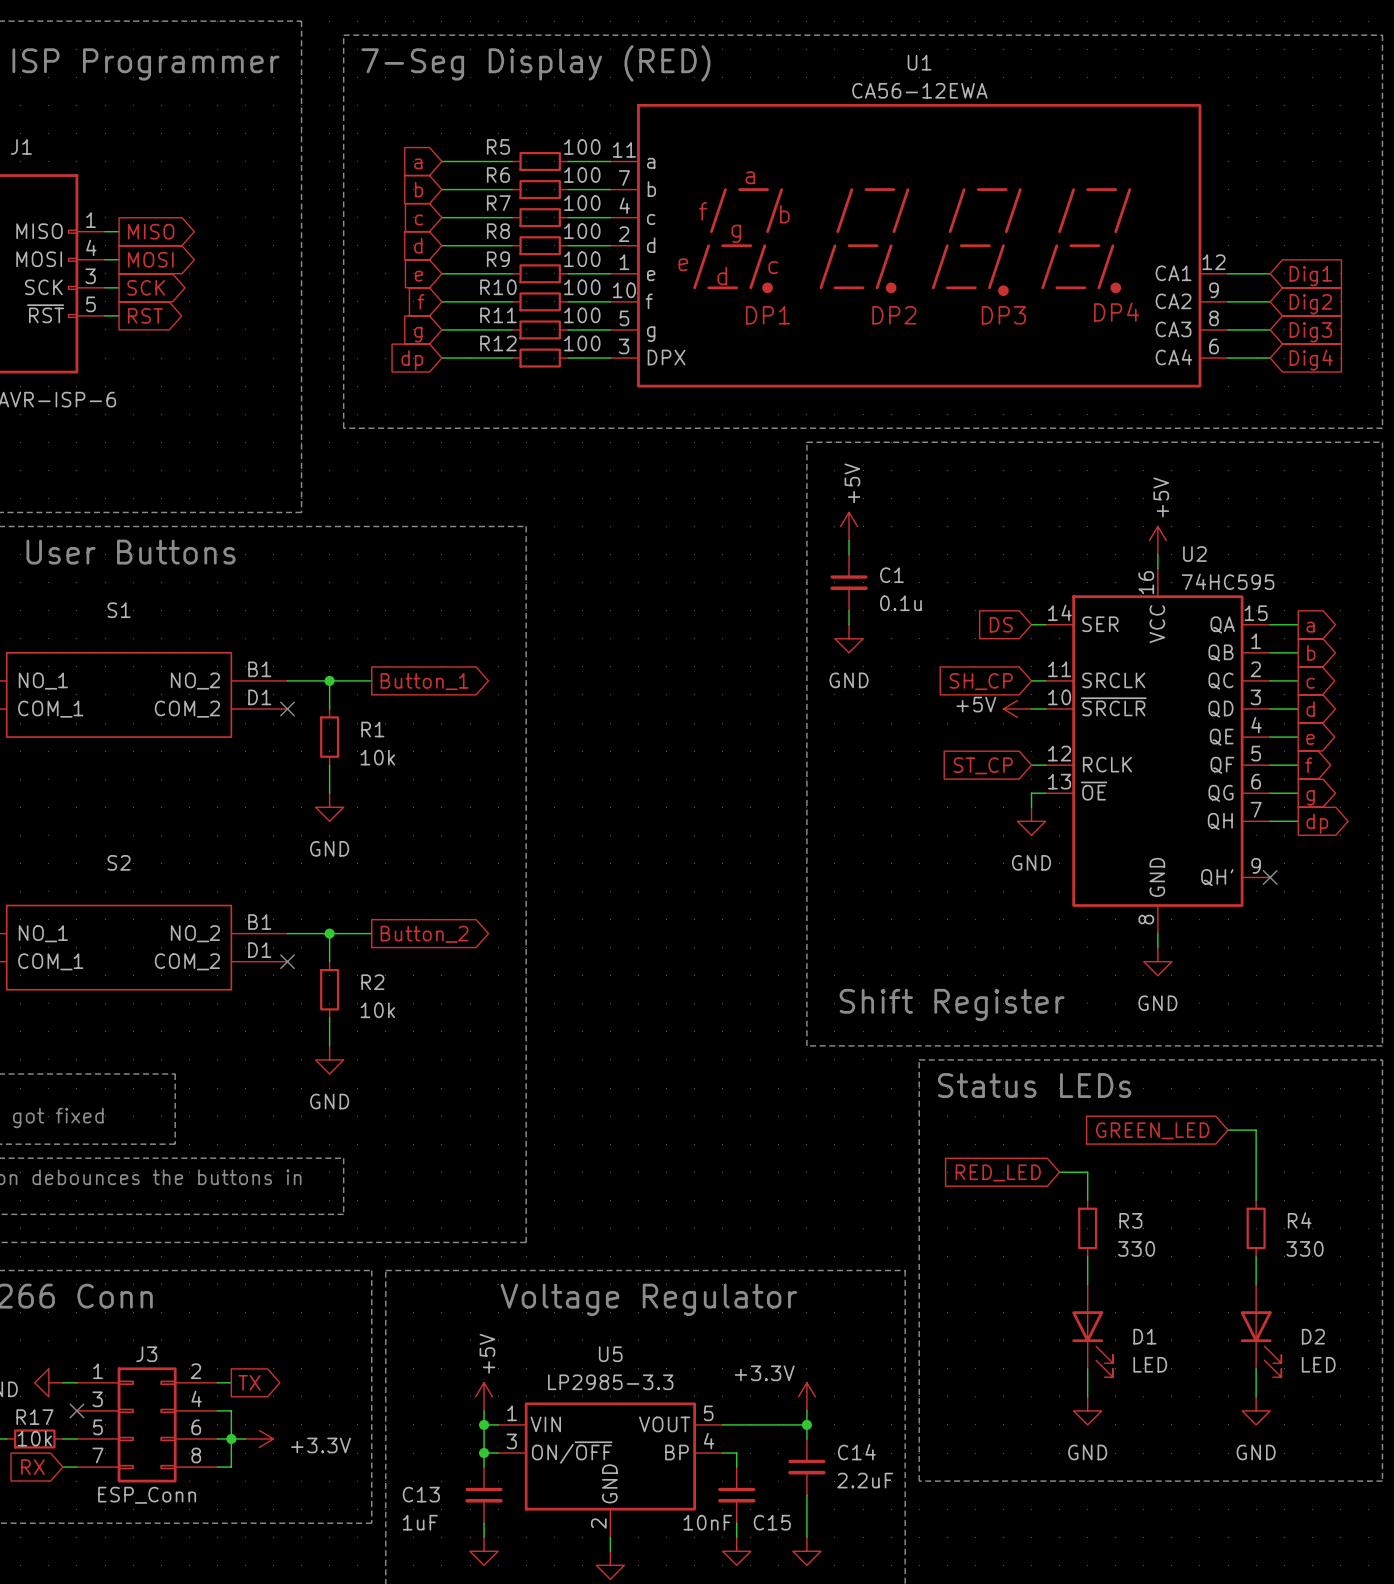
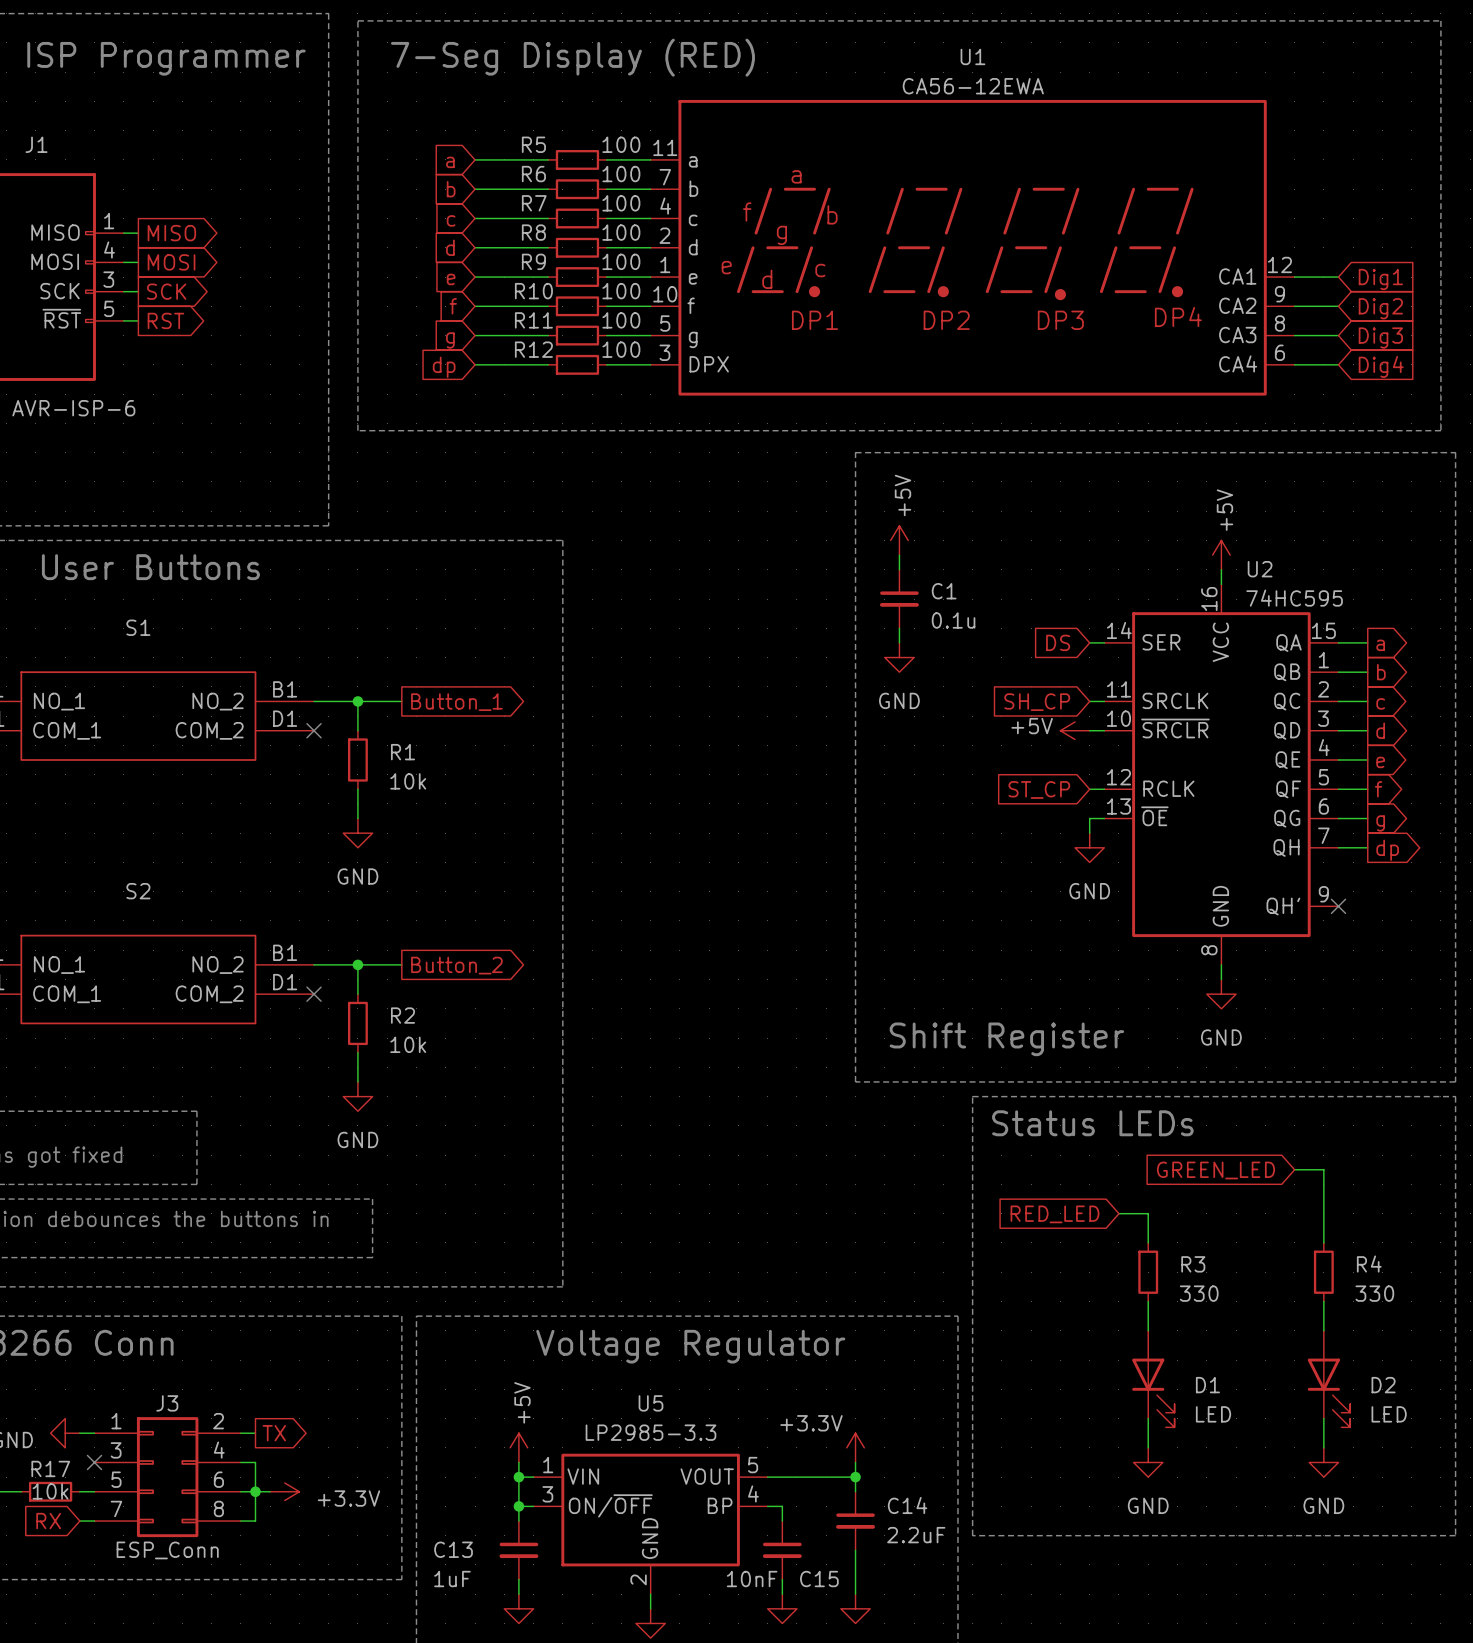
line: (343, 35) (1382, 35) (1382, 428) (343, 428) (343, 35) -> (357, 20) (1440, 20) (1440, 430) (357, 430) (357, 20)

